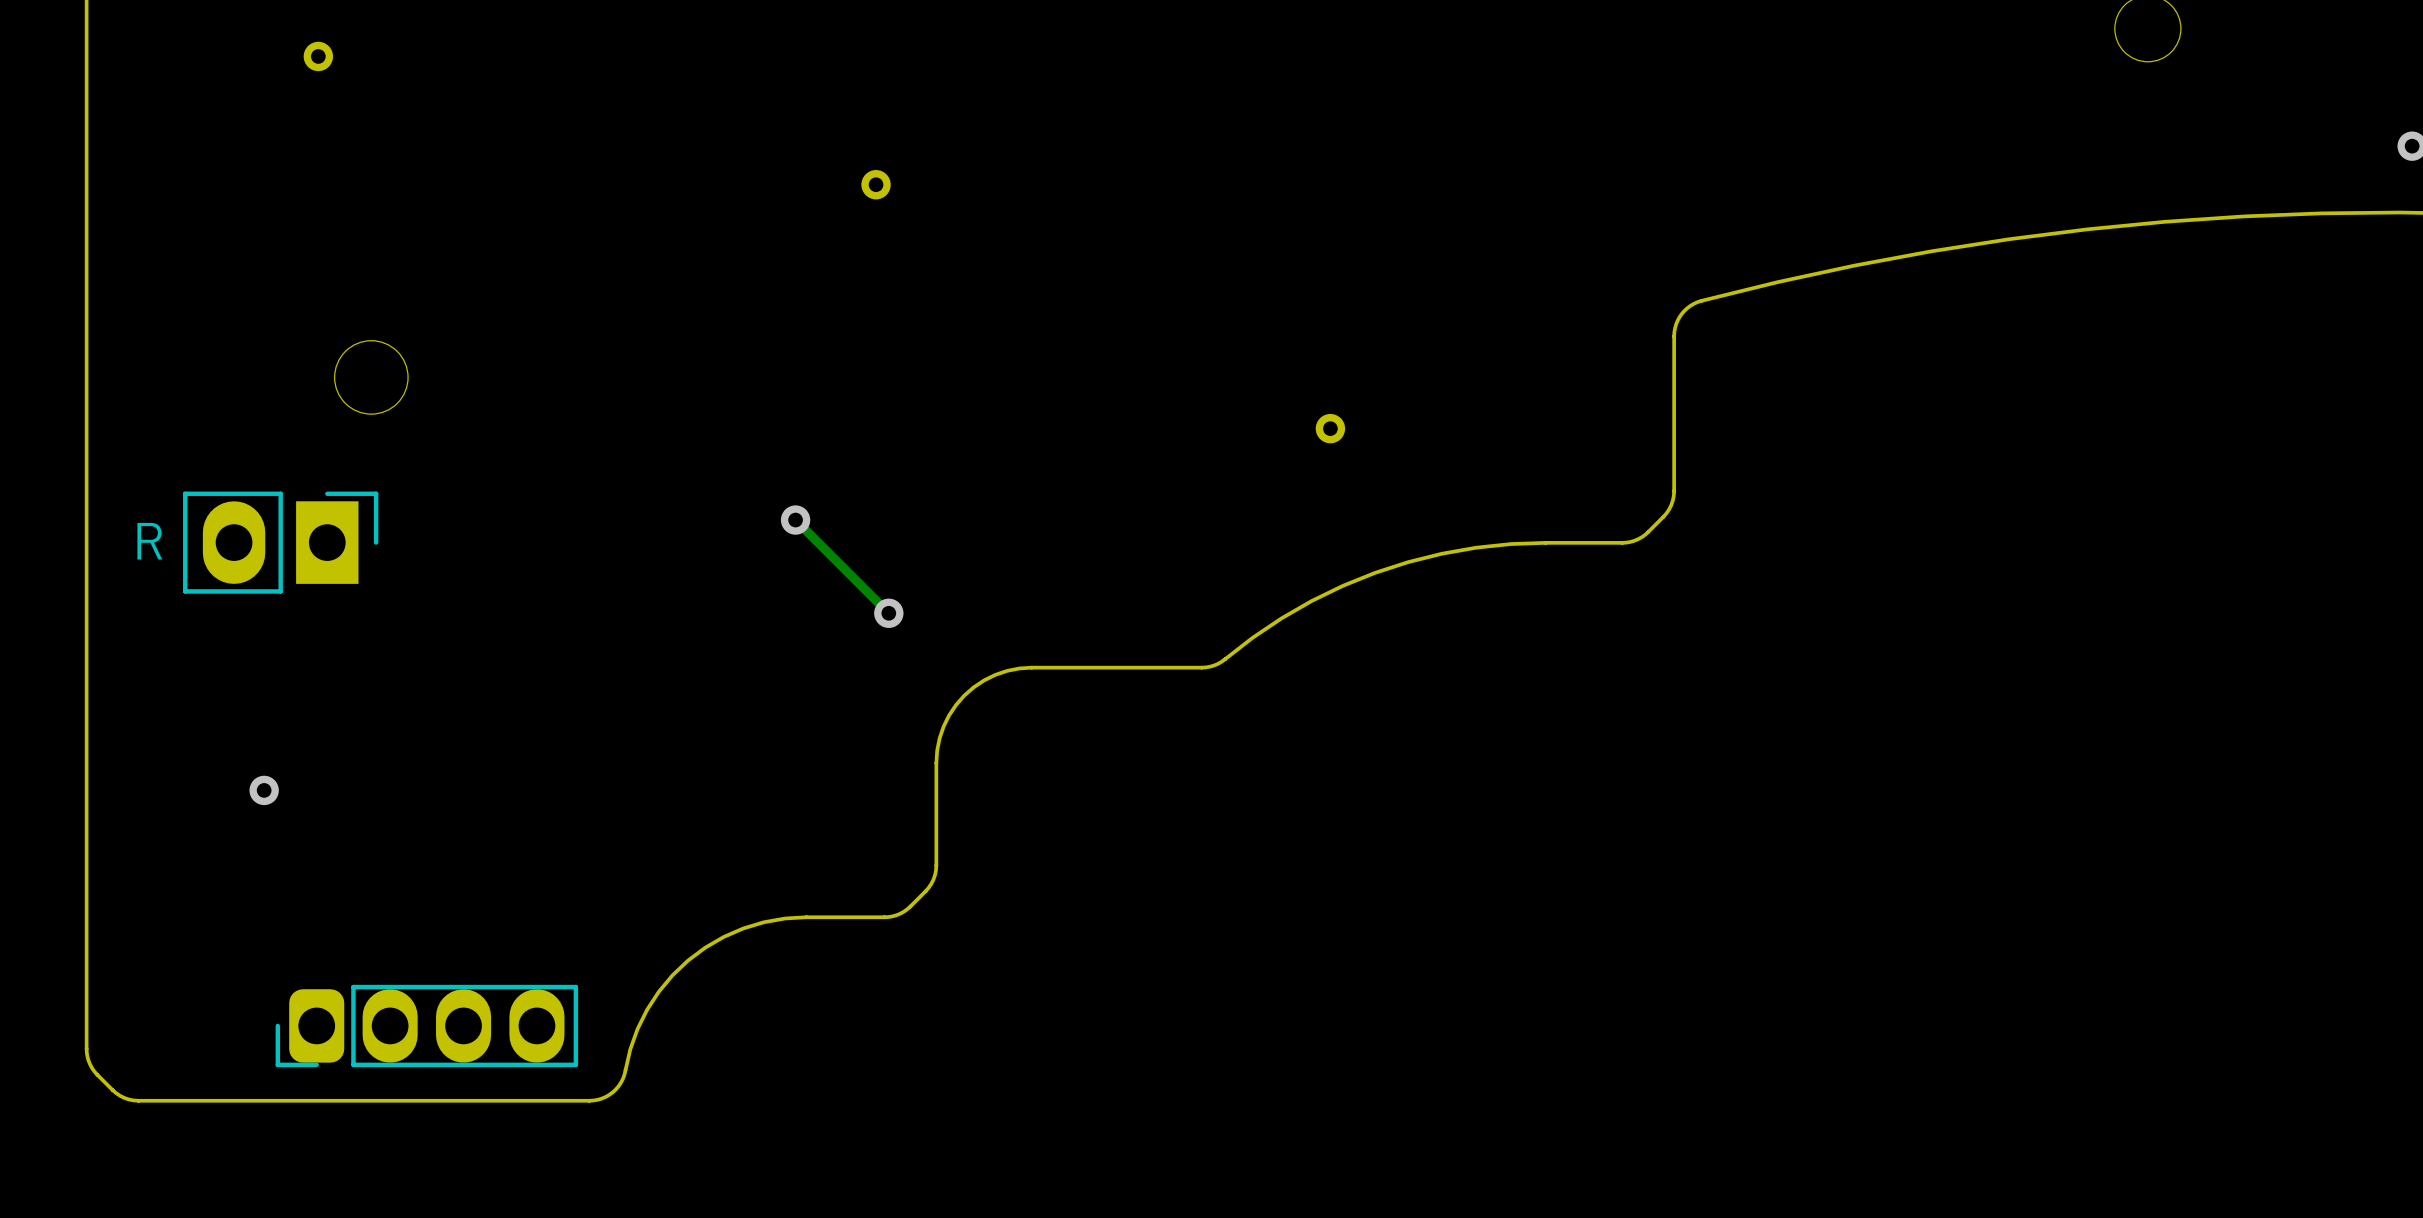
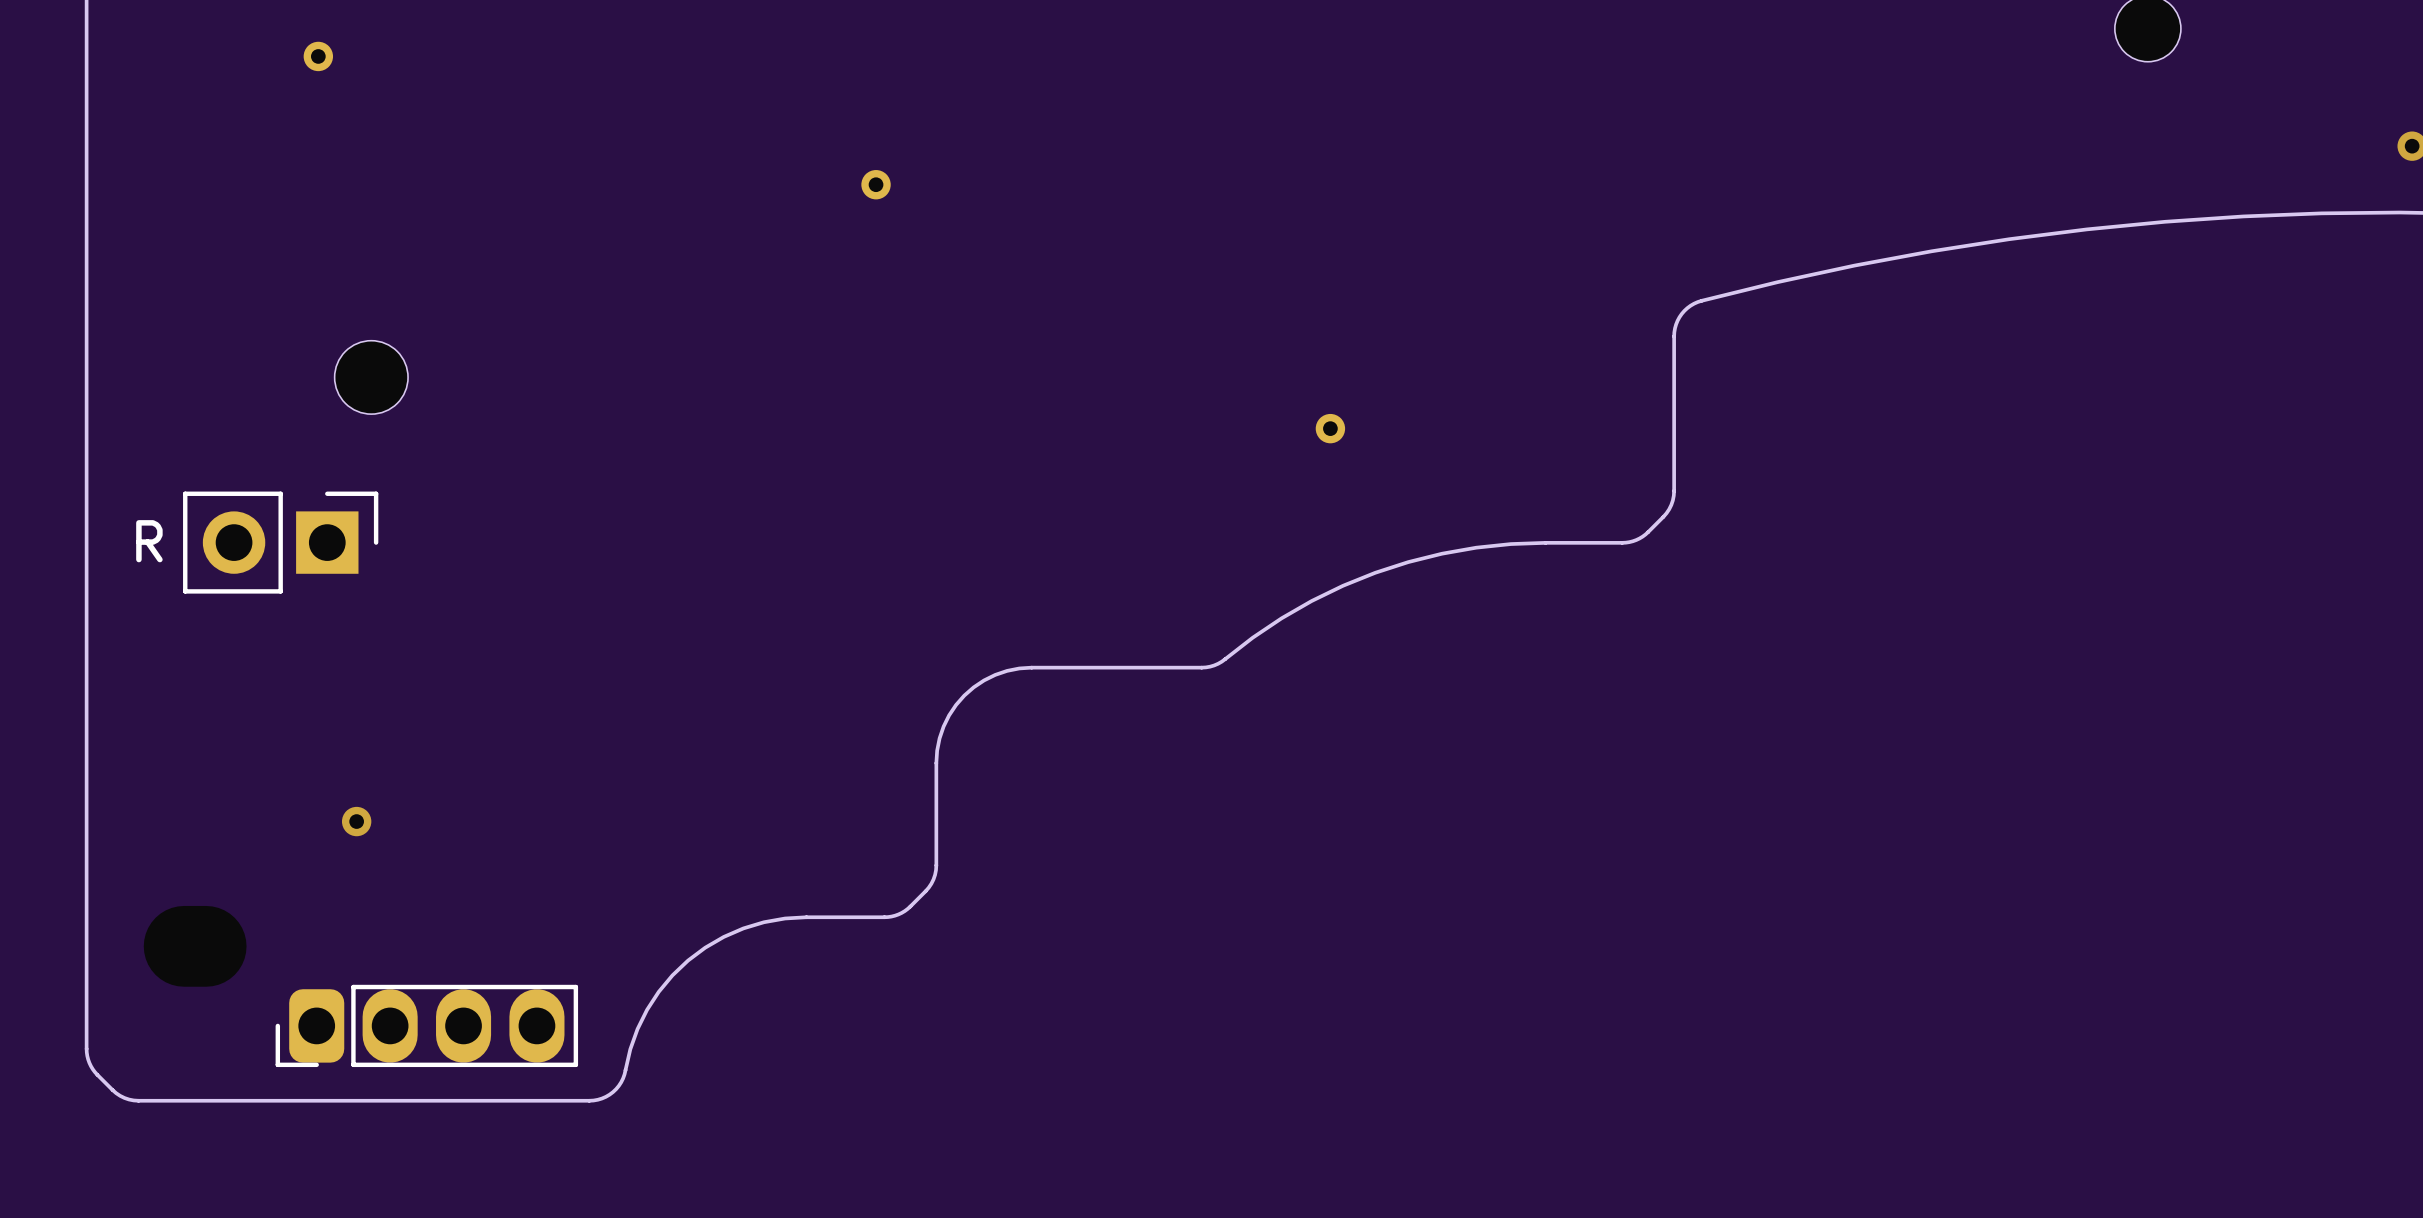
part footprint: [183, 491, 379, 594] -> [183, 491, 379, 594]
track: (795, 520) (888, 613) -> none
via: (795, 520) -> none
via: (888, 613) -> none
via position: (264, 790) -> (356, 821)

